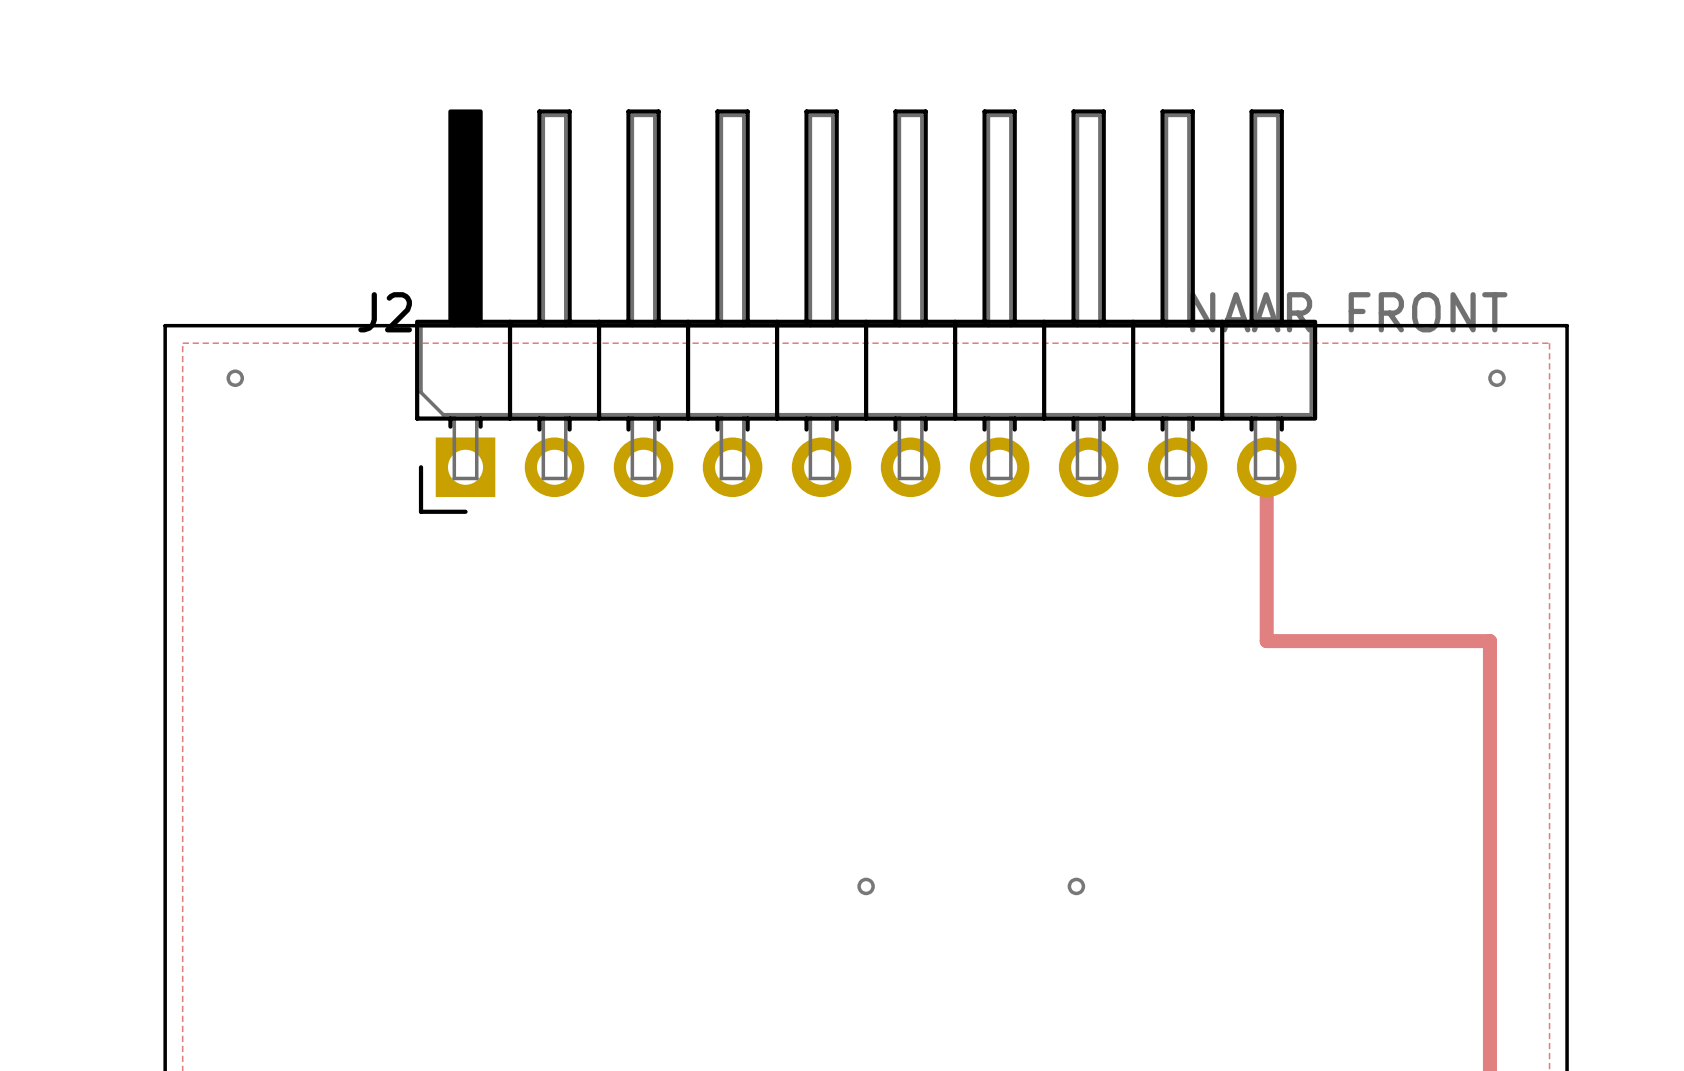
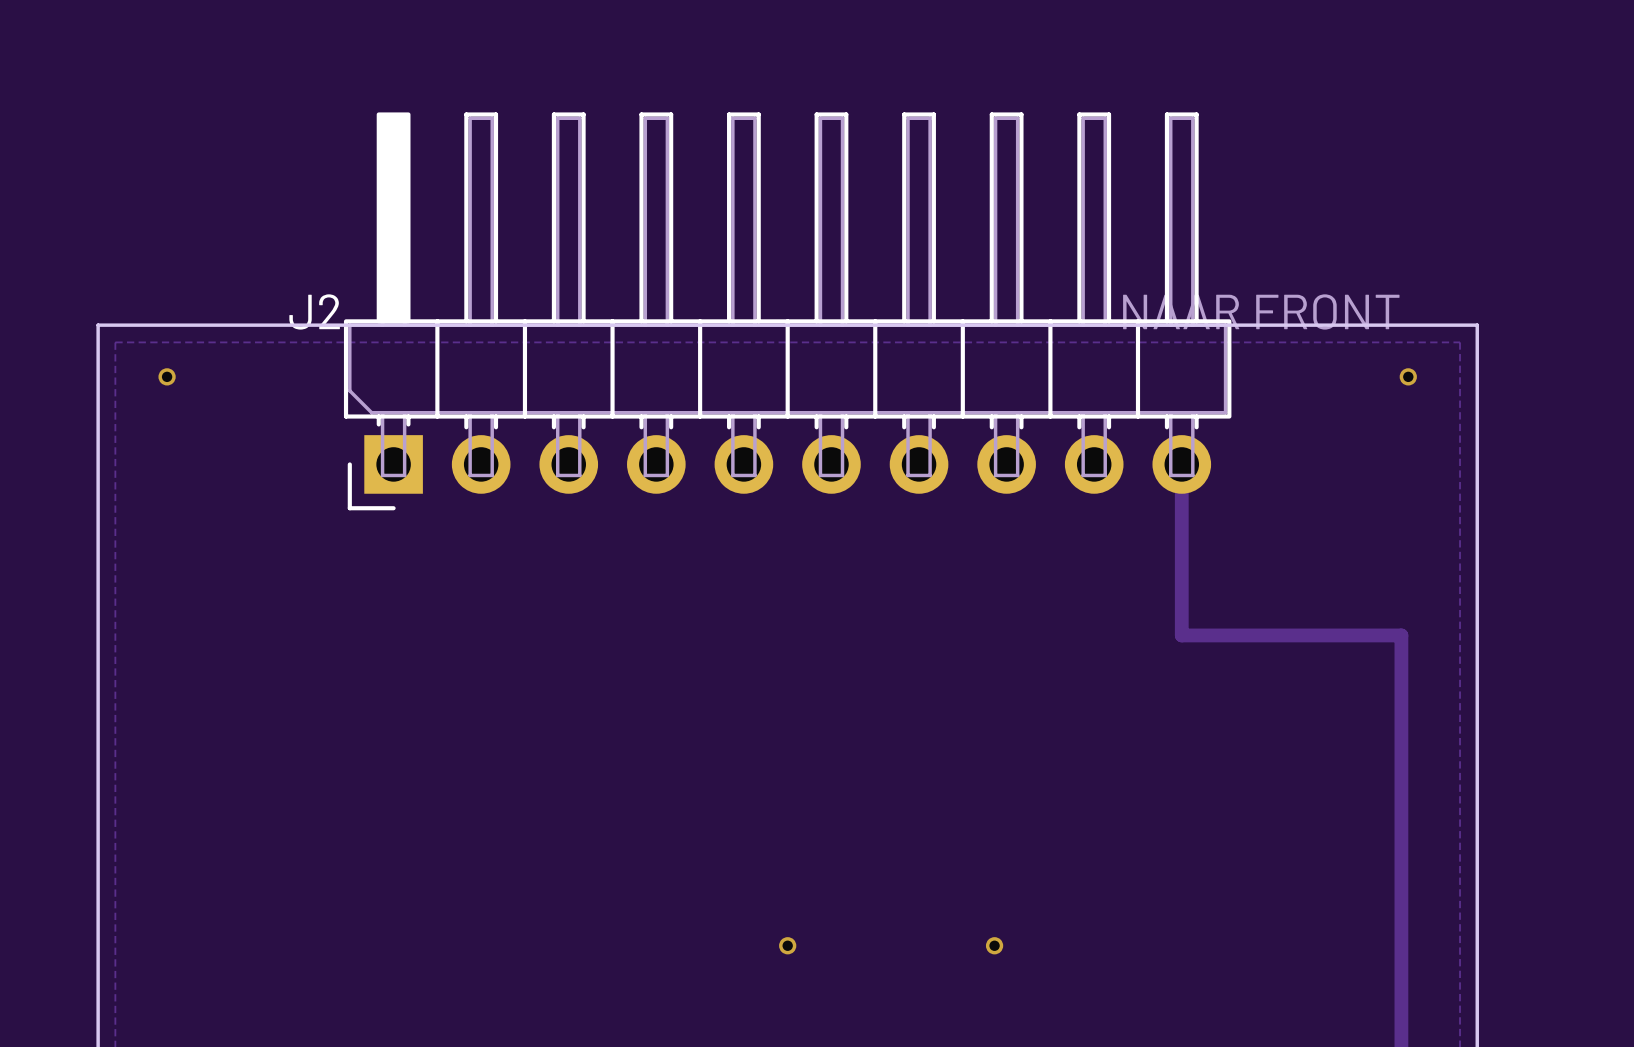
via position: (866, 886) -> (787, 945)
via position: (1076, 886) -> (994, 945)

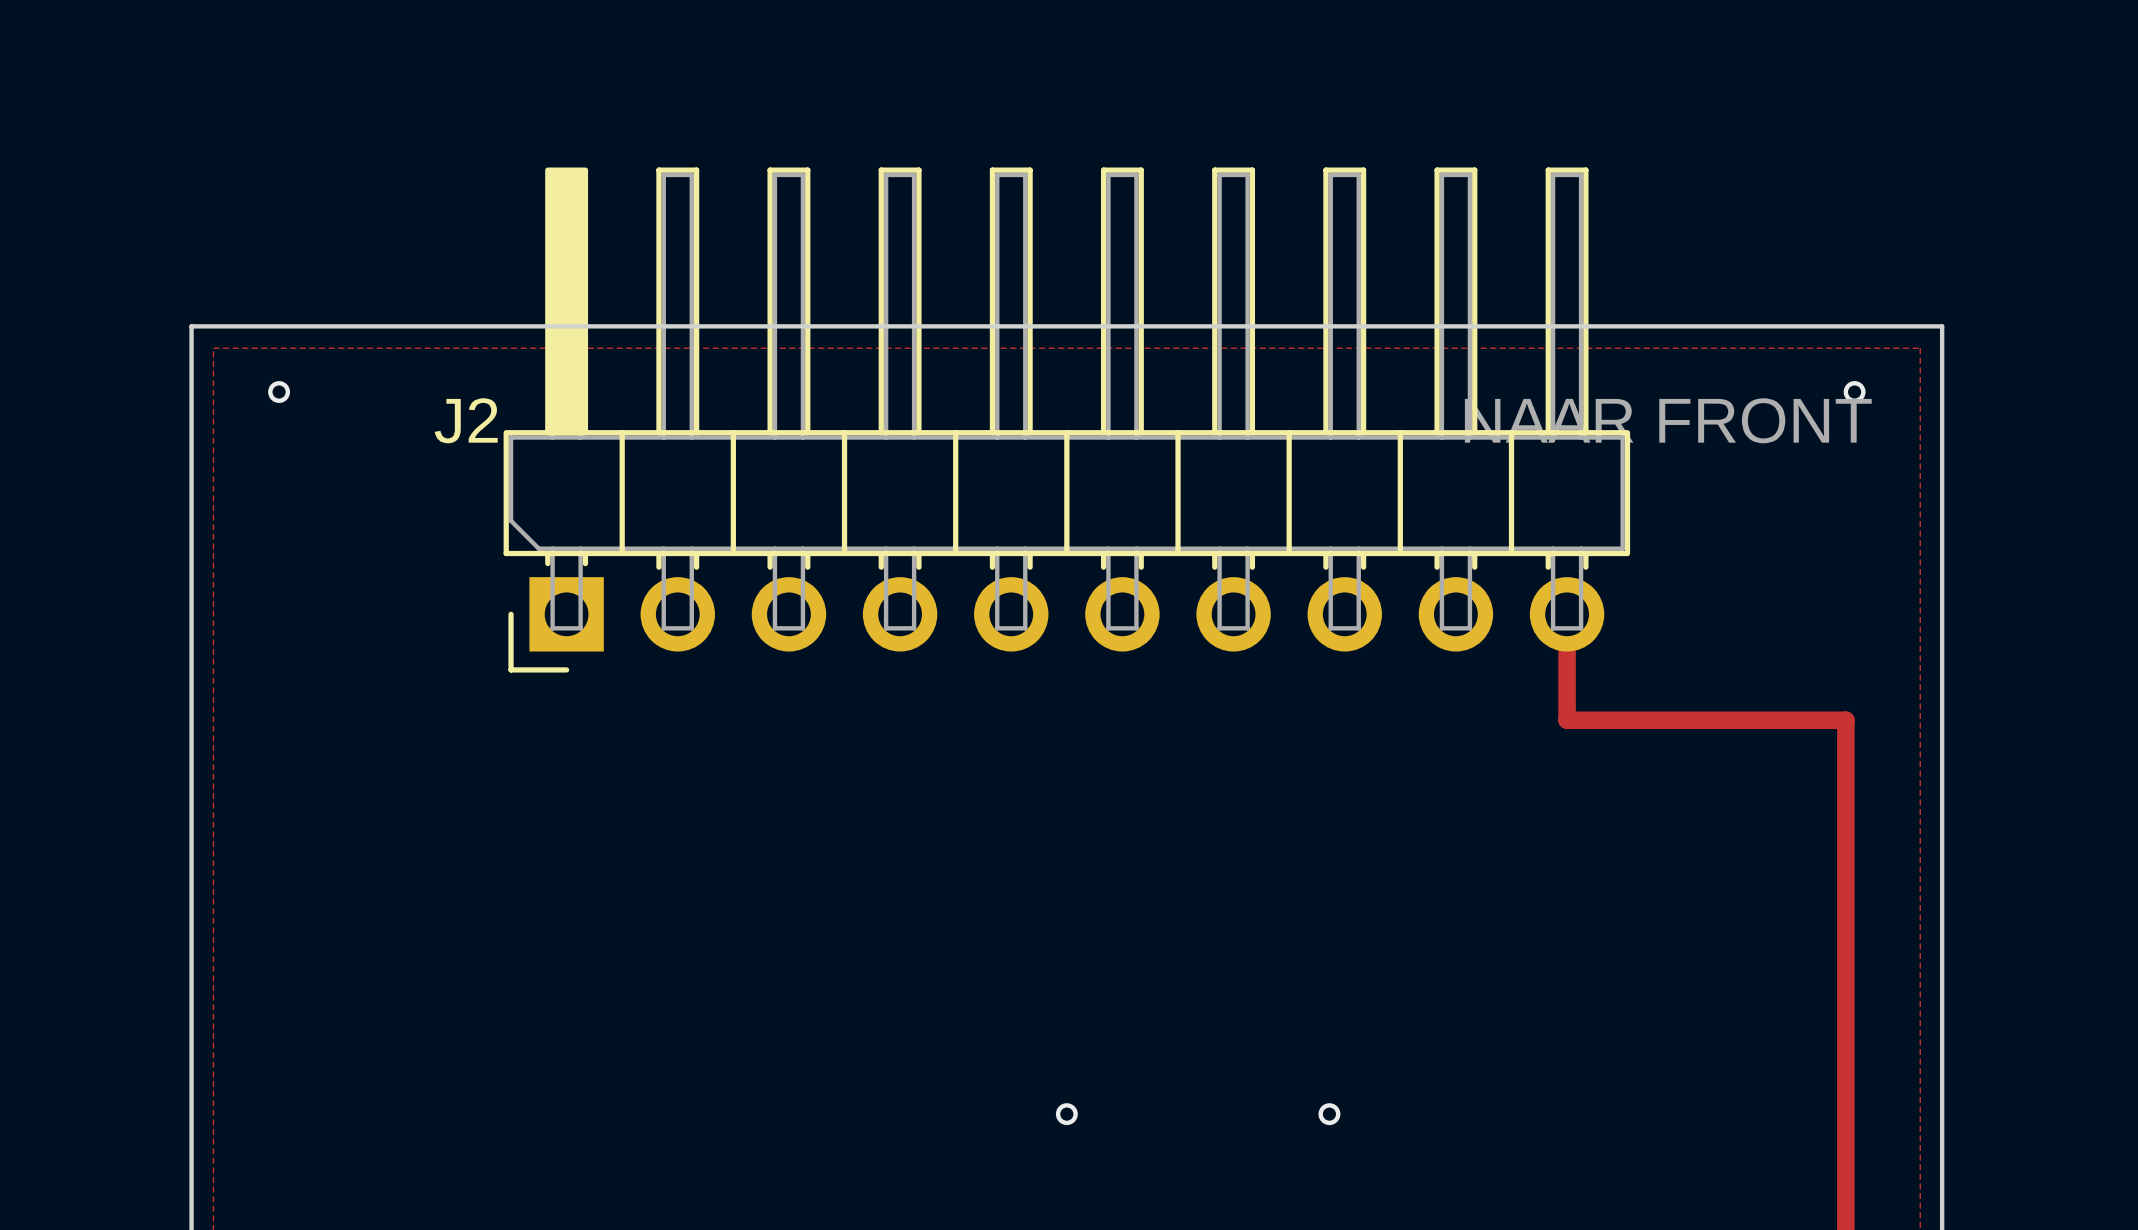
J2 position: (787, 311) -> (1066, 420)
track: (1181, 464) (1181, 552) -> none

